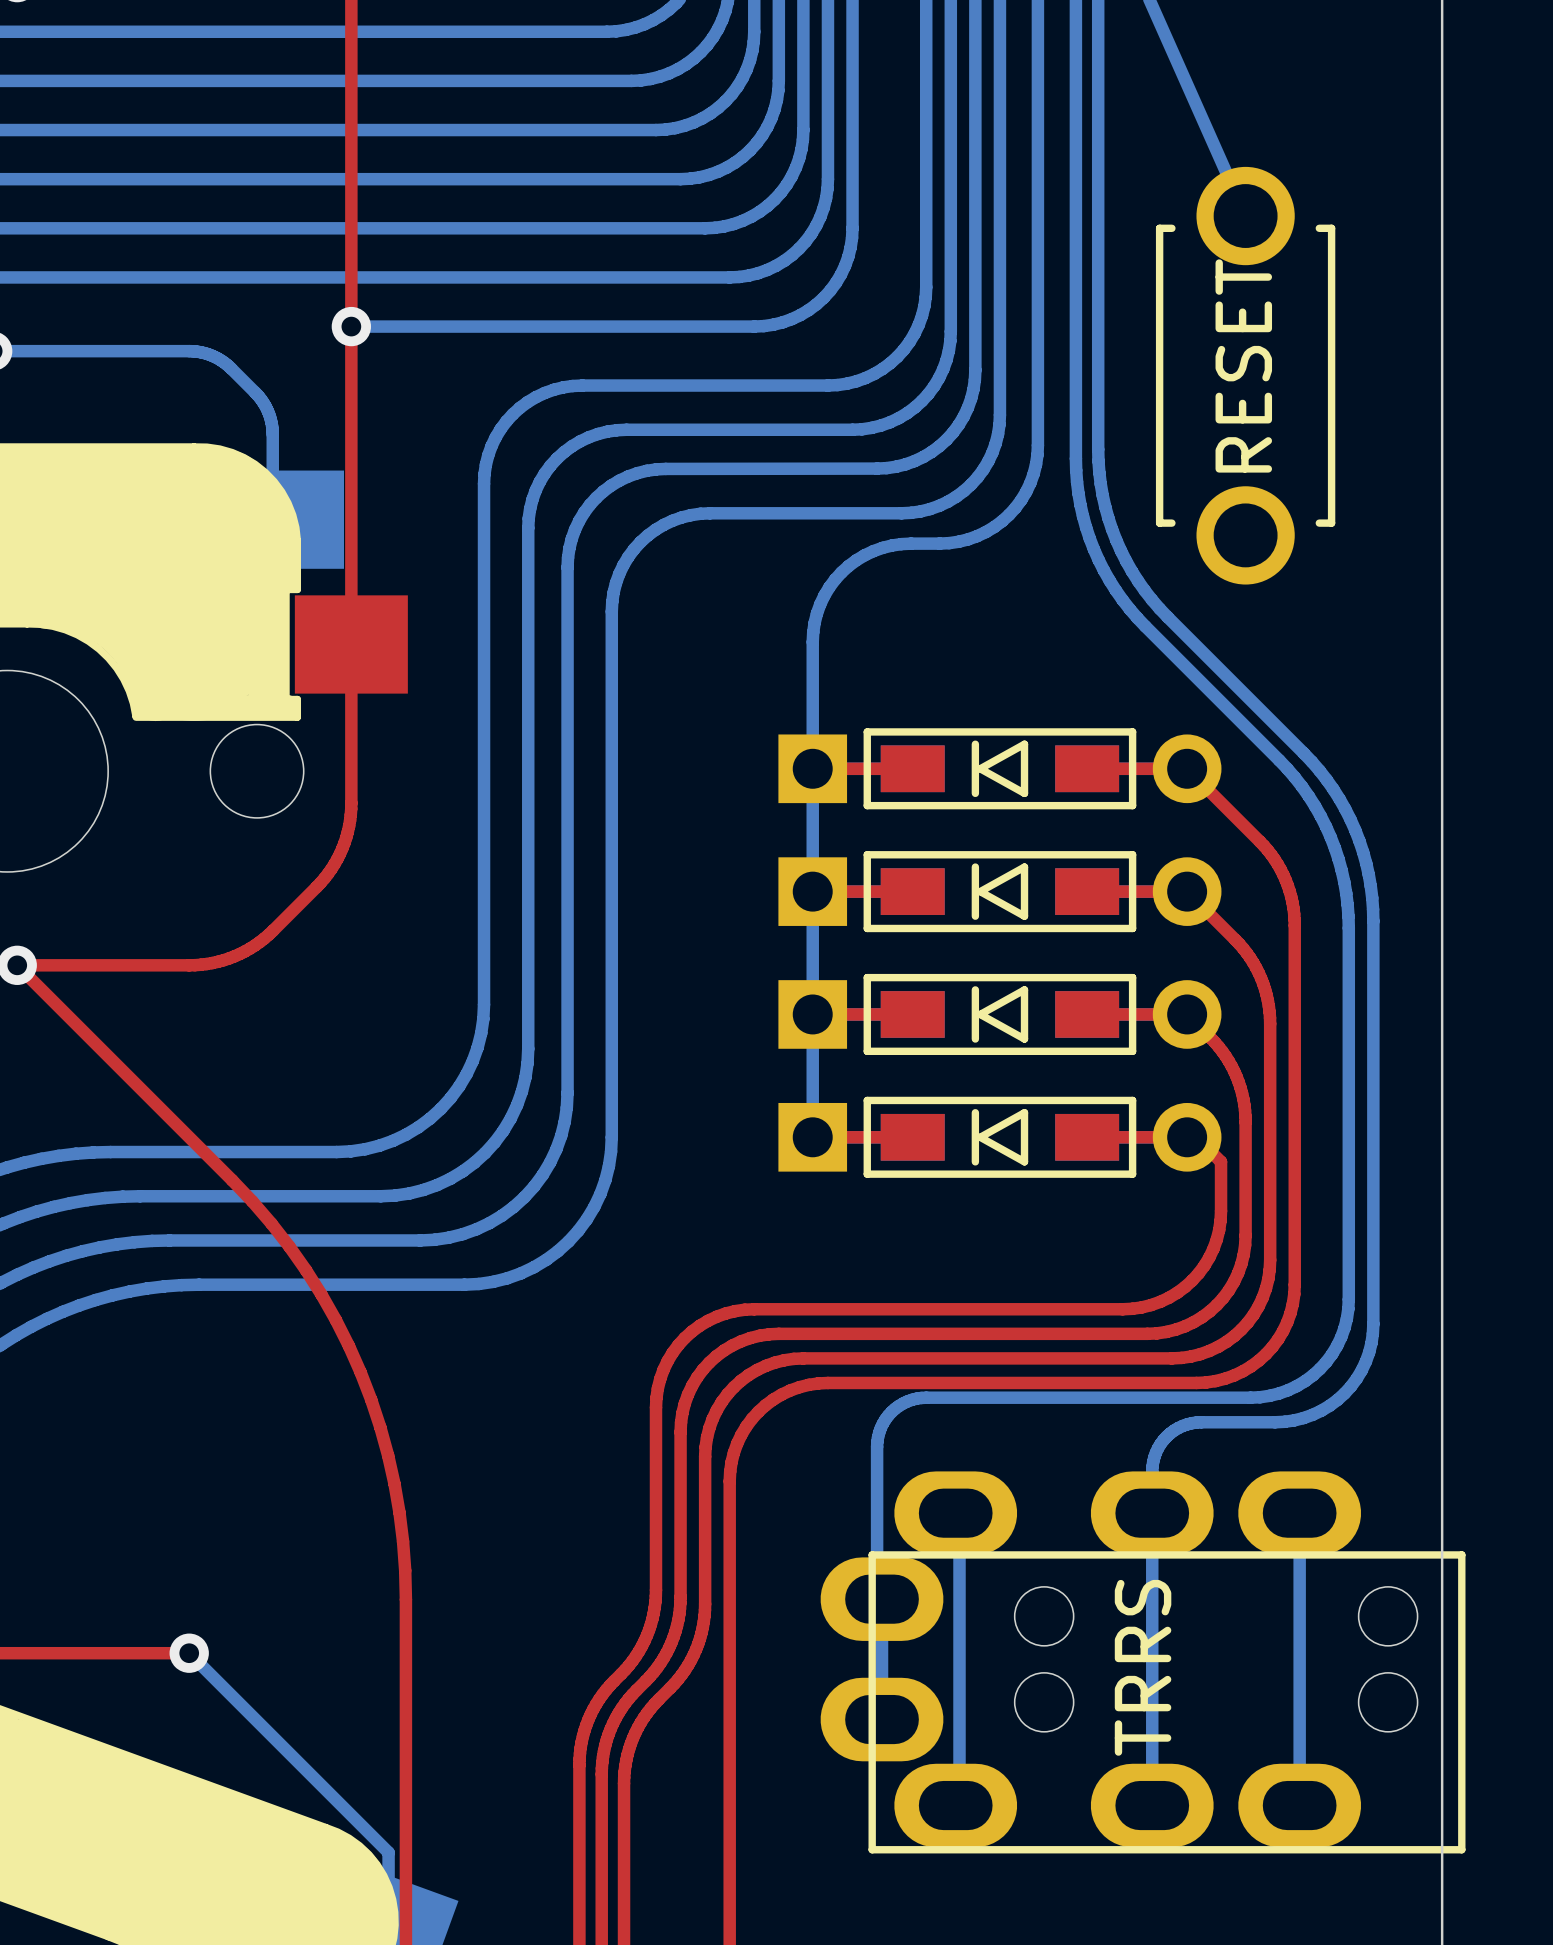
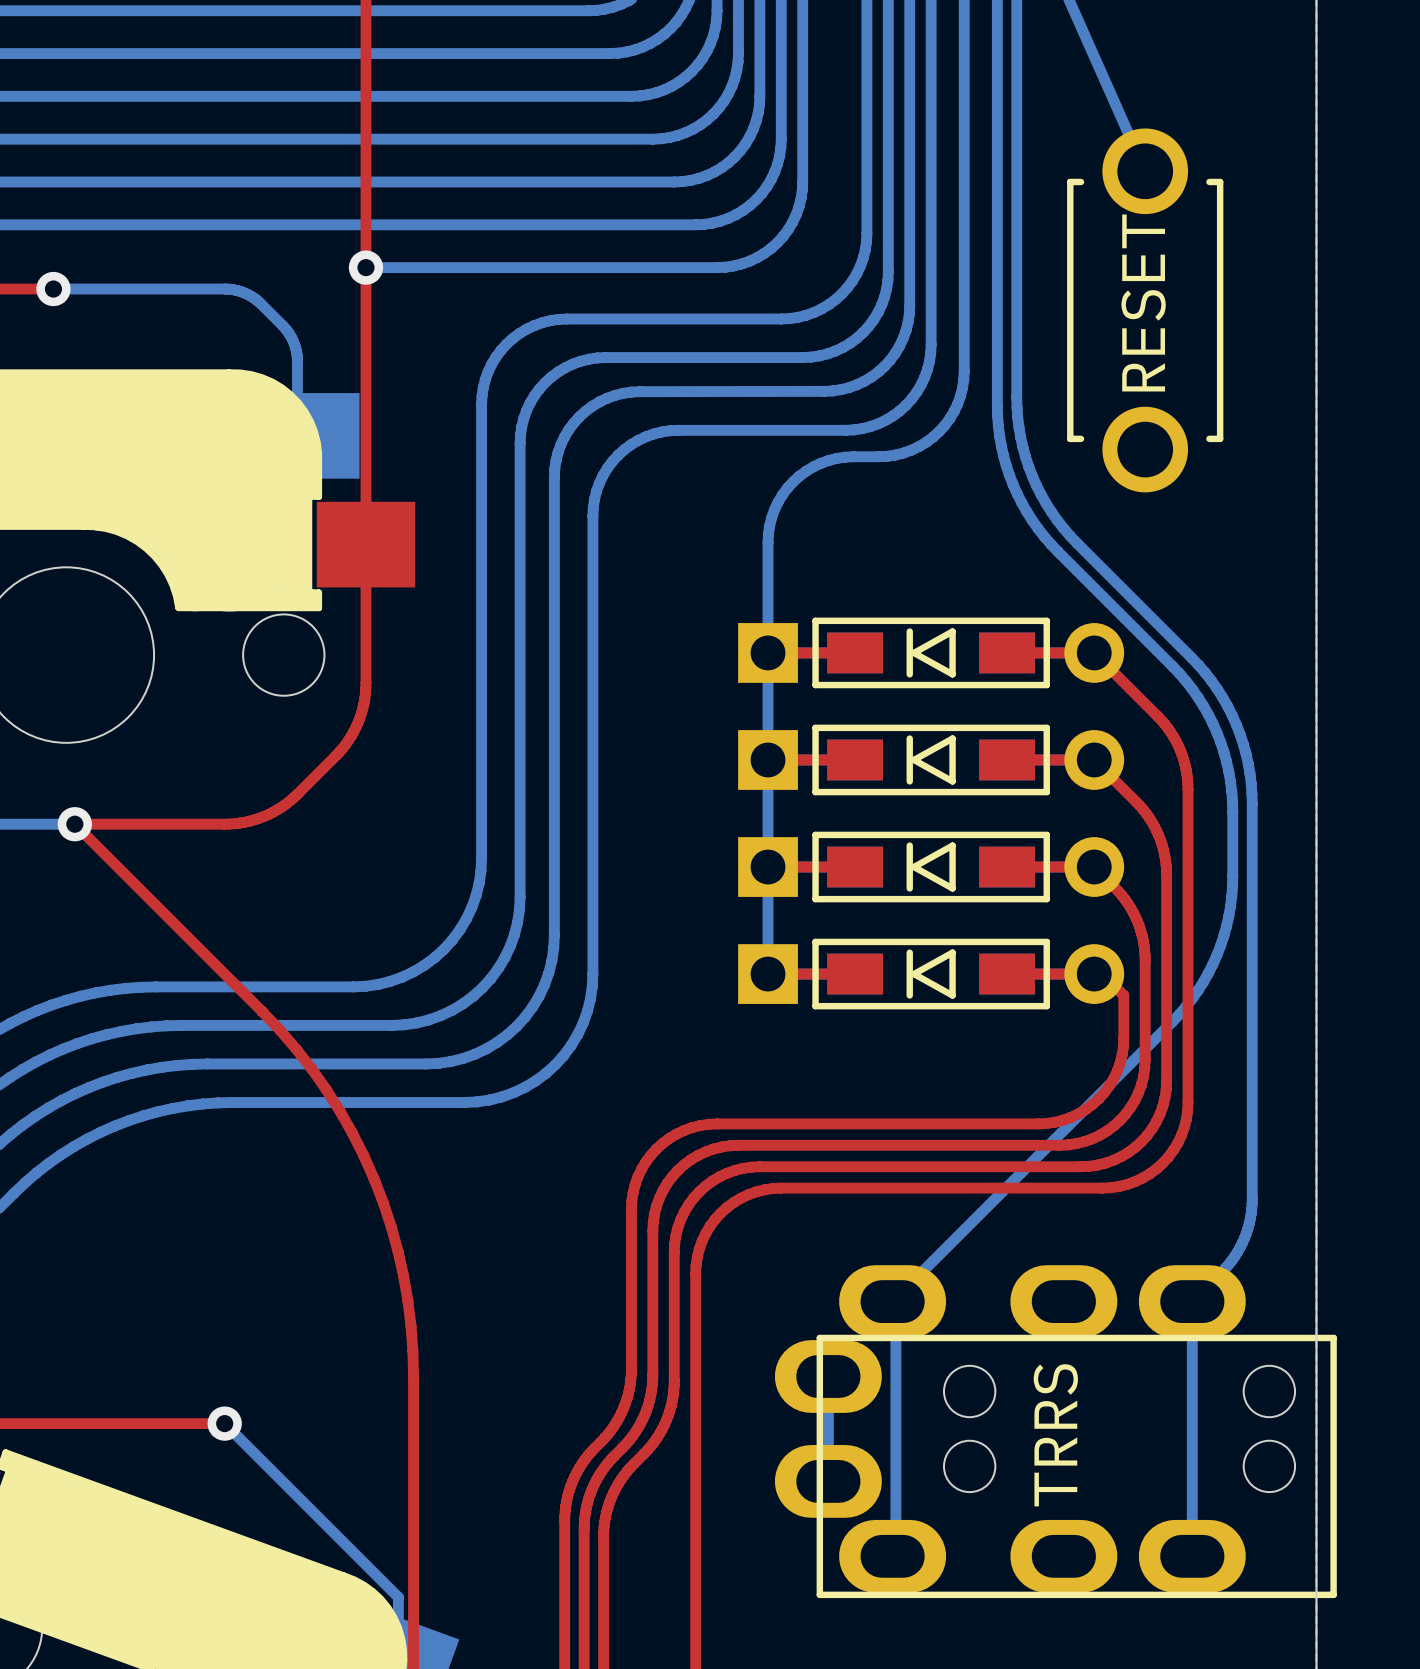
bottom track: (1098, 449) (1100, 484) (1105, 507) (1116, 540) (1131, 571) (1159, 608) (1303, 753) (1326, 779) (1345, 809) (1359, 841) (1368, 874) (1373, 909) (1373, 1324) (1371, 1343) (1365, 1361) (1356, 1378) (1344, 1393) (1321, 1410) (1303, 1418) (1284, 1421) (1191, 1423) (1170, 1433) (1158, 1448) (1152, 1471) (1152, 1805) -> (1016, 374) (1017, 417) (1022, 447) (1032, 476) (1046, 503) (1070, 536) (1191, 657) (1211, 680) (1232, 715) (1248, 763) (1252, 804) (1251, 1208) (1246, 1233) (1234, 1256) (1192, 1301)
bottom track: (1075, 458) (1078, 493) (1086, 527) (1098, 560) (1115, 590) (1145, 626) (1294, 777) (1320, 816) (1338, 859) (1346, 893) (1348, 928) (1348, 1299) (1346, 1318) (1337, 1345) (1320, 1368) (1296, 1386) (1269, 1395) (1250, 1397) (926, 1397) (911, 1399) (898, 1405) (882, 1423) (877, 1442) (877, 1594) (882, 1599) -> (997, 382) (998, 425) (1003, 455) (1013, 484) (1026, 511) (1050, 544) (1179, 673) (1197, 697) (1212, 723) (1226, 761) (1231, 791) (1231, 896) (1226, 925) (1217, 954) (1203, 982) (1185, 1006) (892, 1301)

